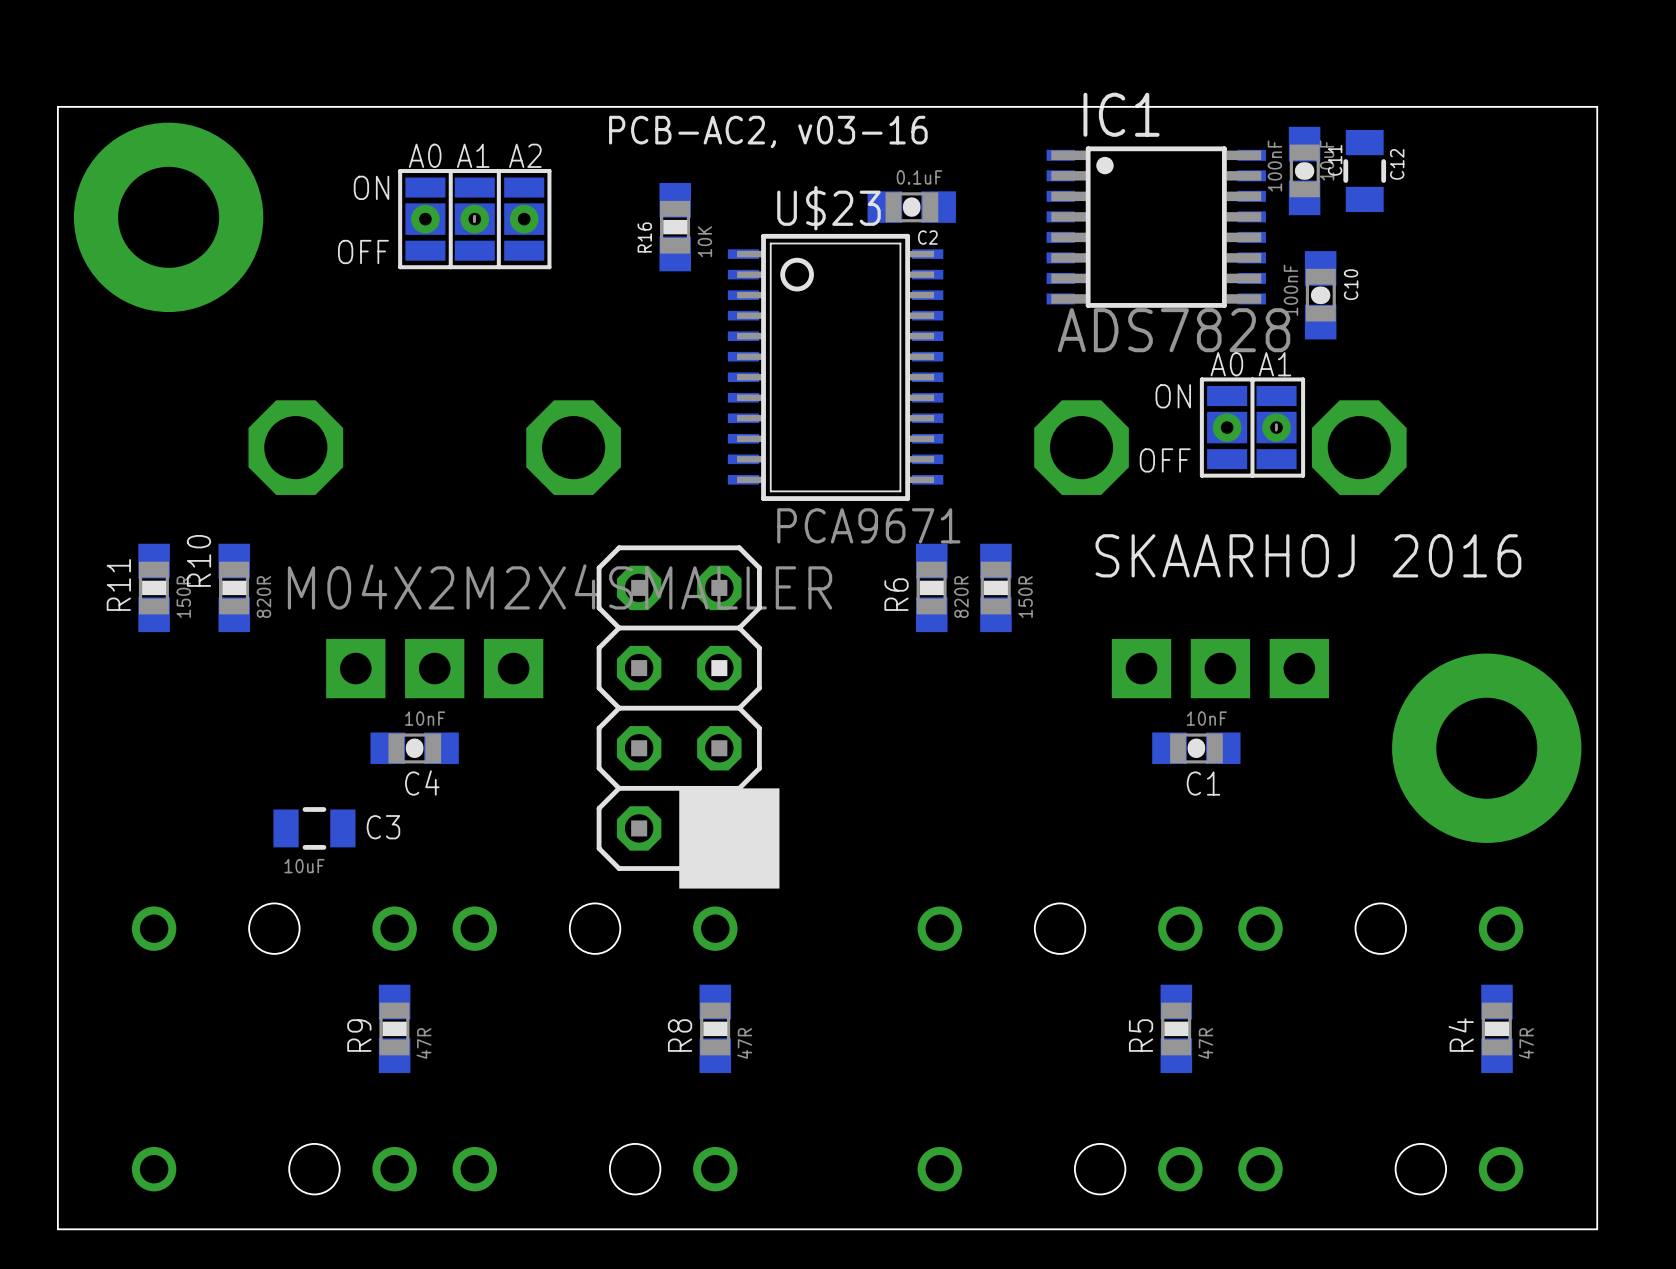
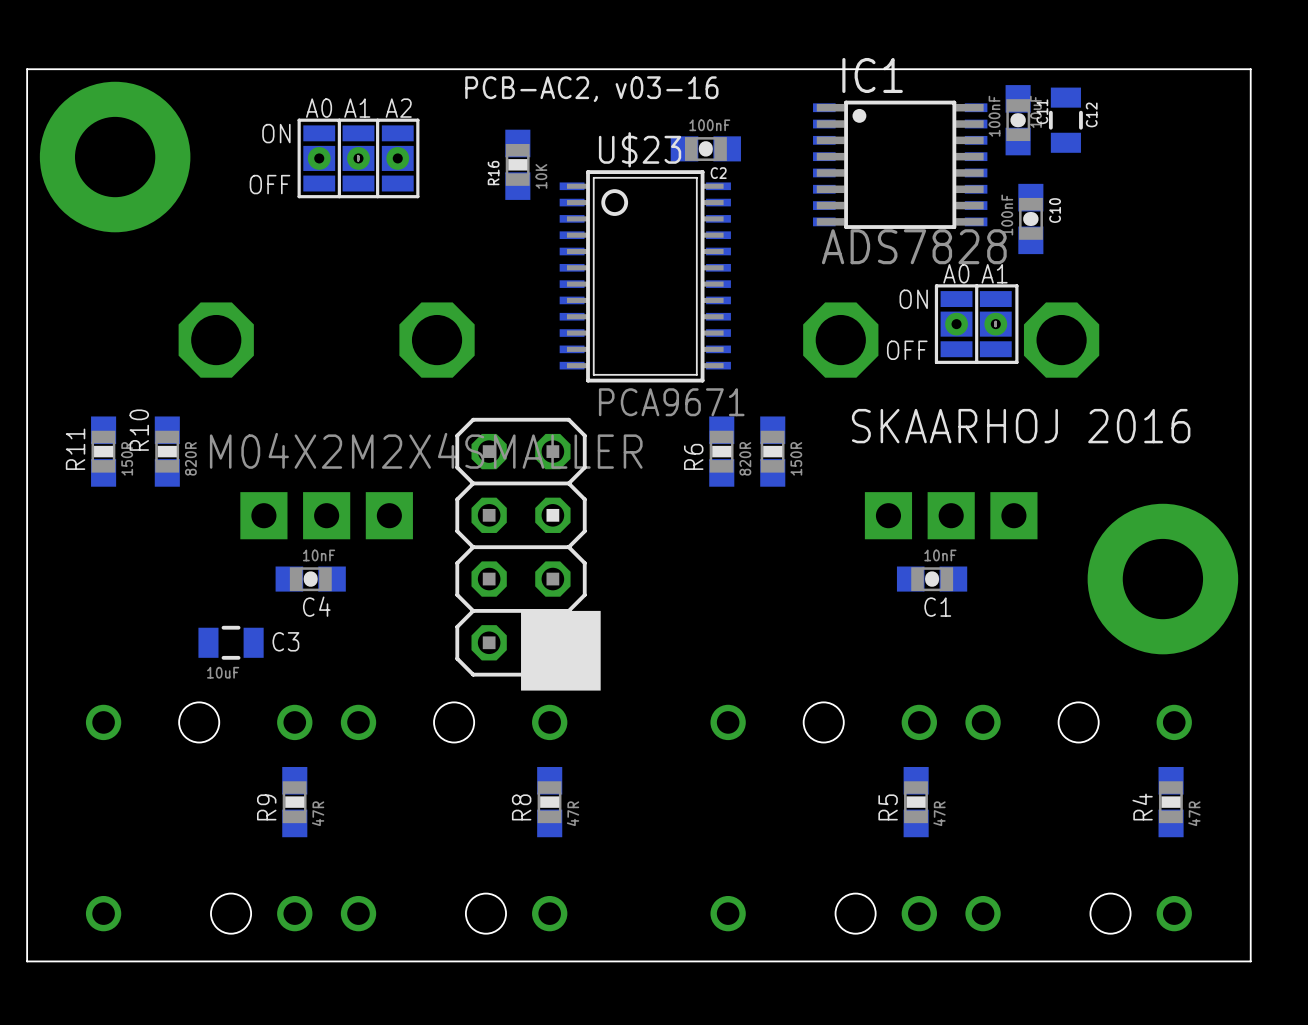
C2 value: 0.1uF (919, 177) -> 100nF (709, 125)

